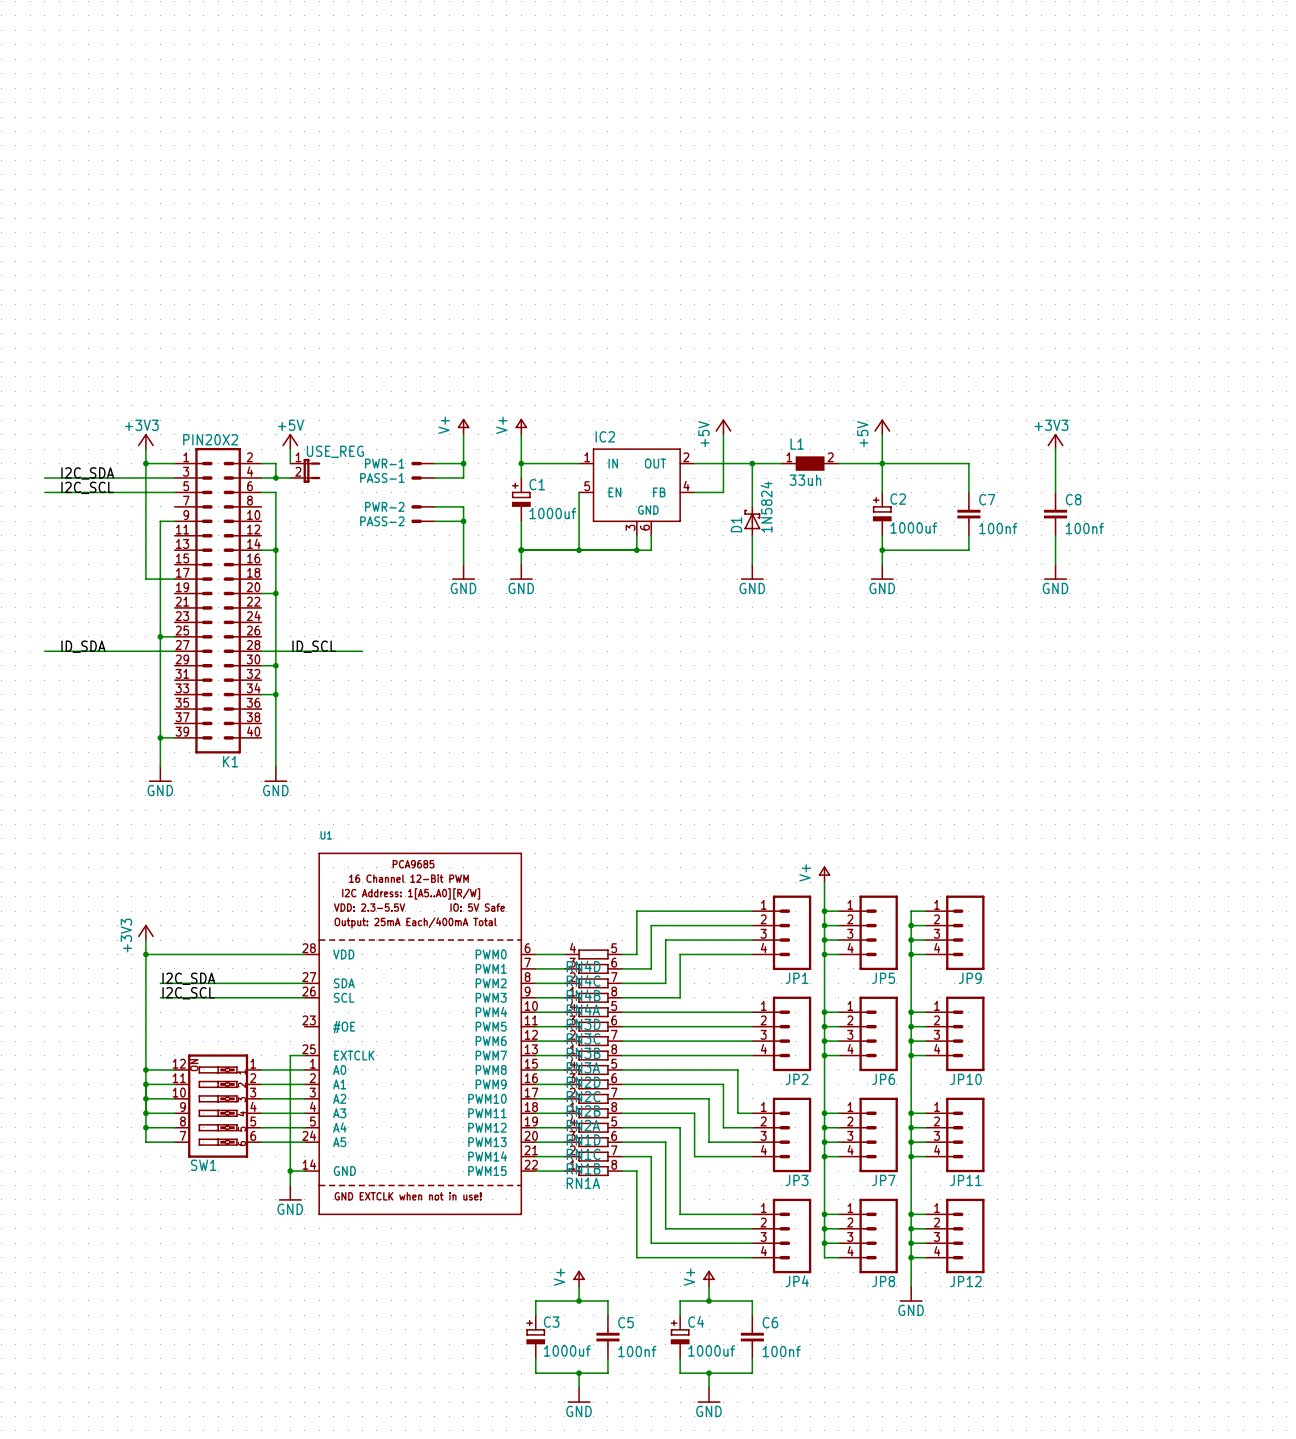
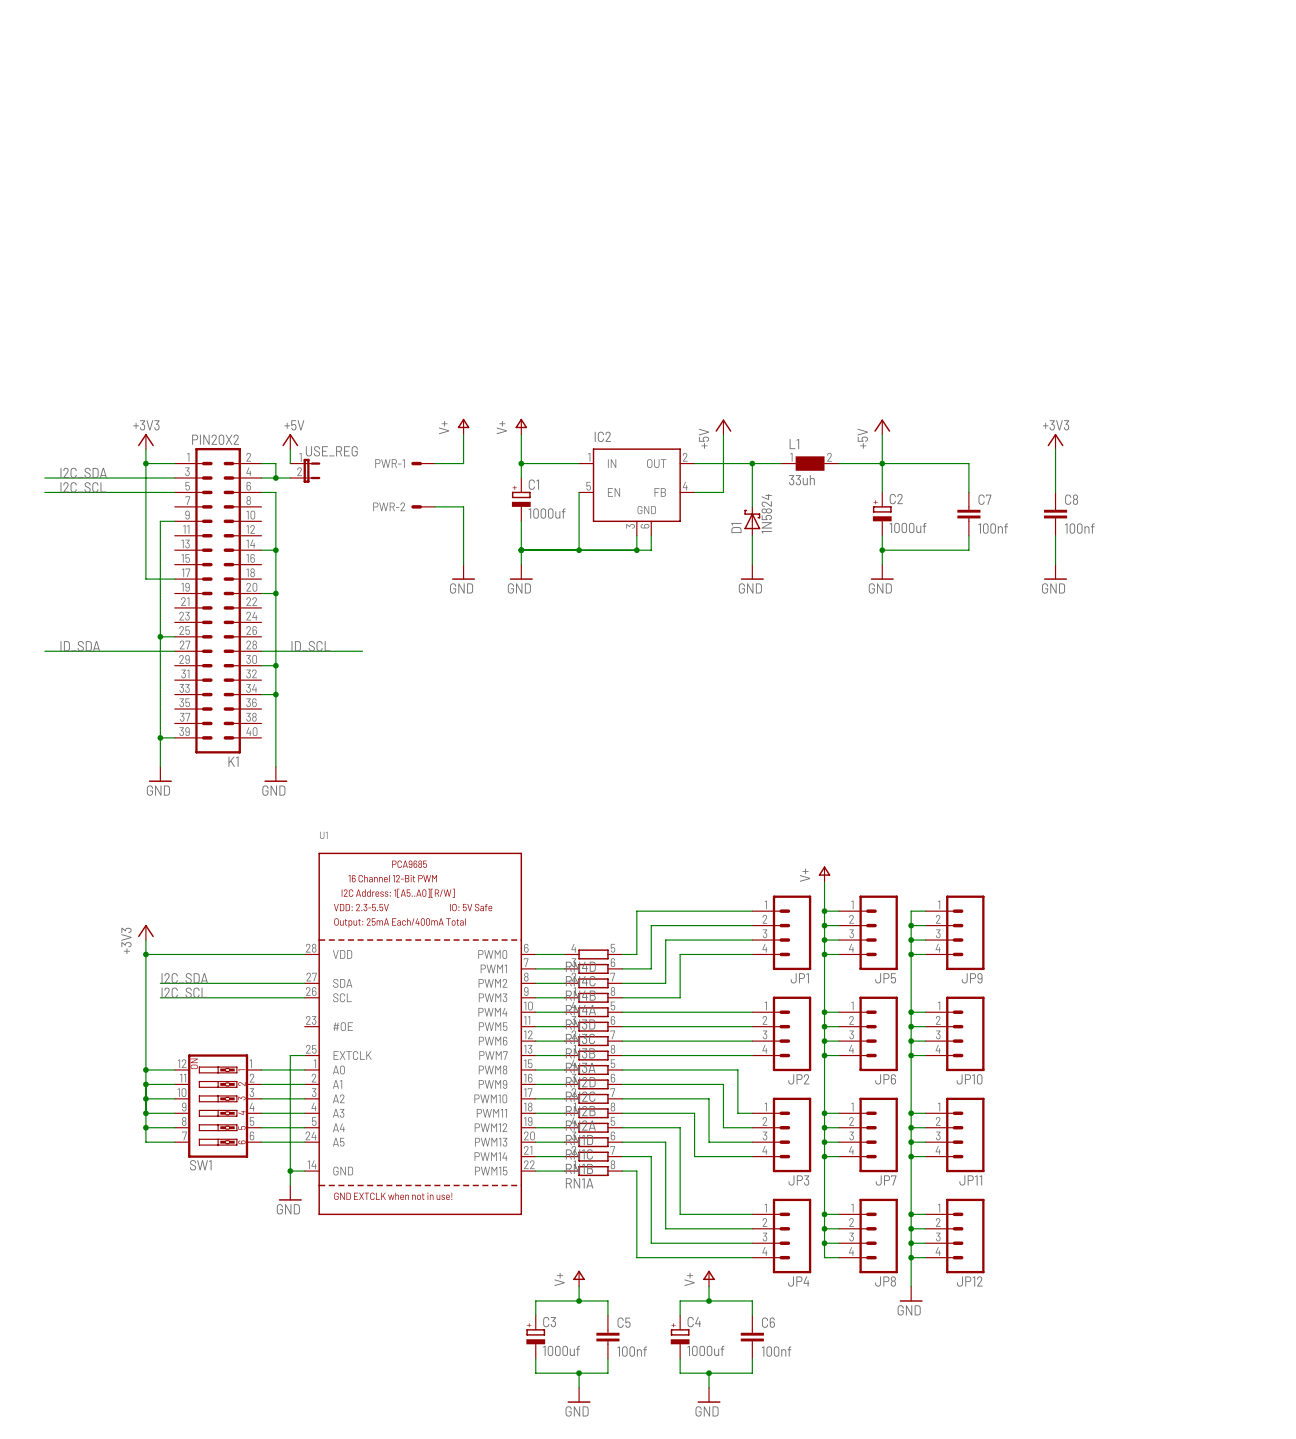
wire: (463, 463) (463, 478) (434, 478) -> none
junction: (463, 463) -> none
PASS-1: (422, 478) -> none
PASS-2: (422, 521) -> none
wire: (434, 521) (463, 521) -> none
junction: (463, 521) -> none

